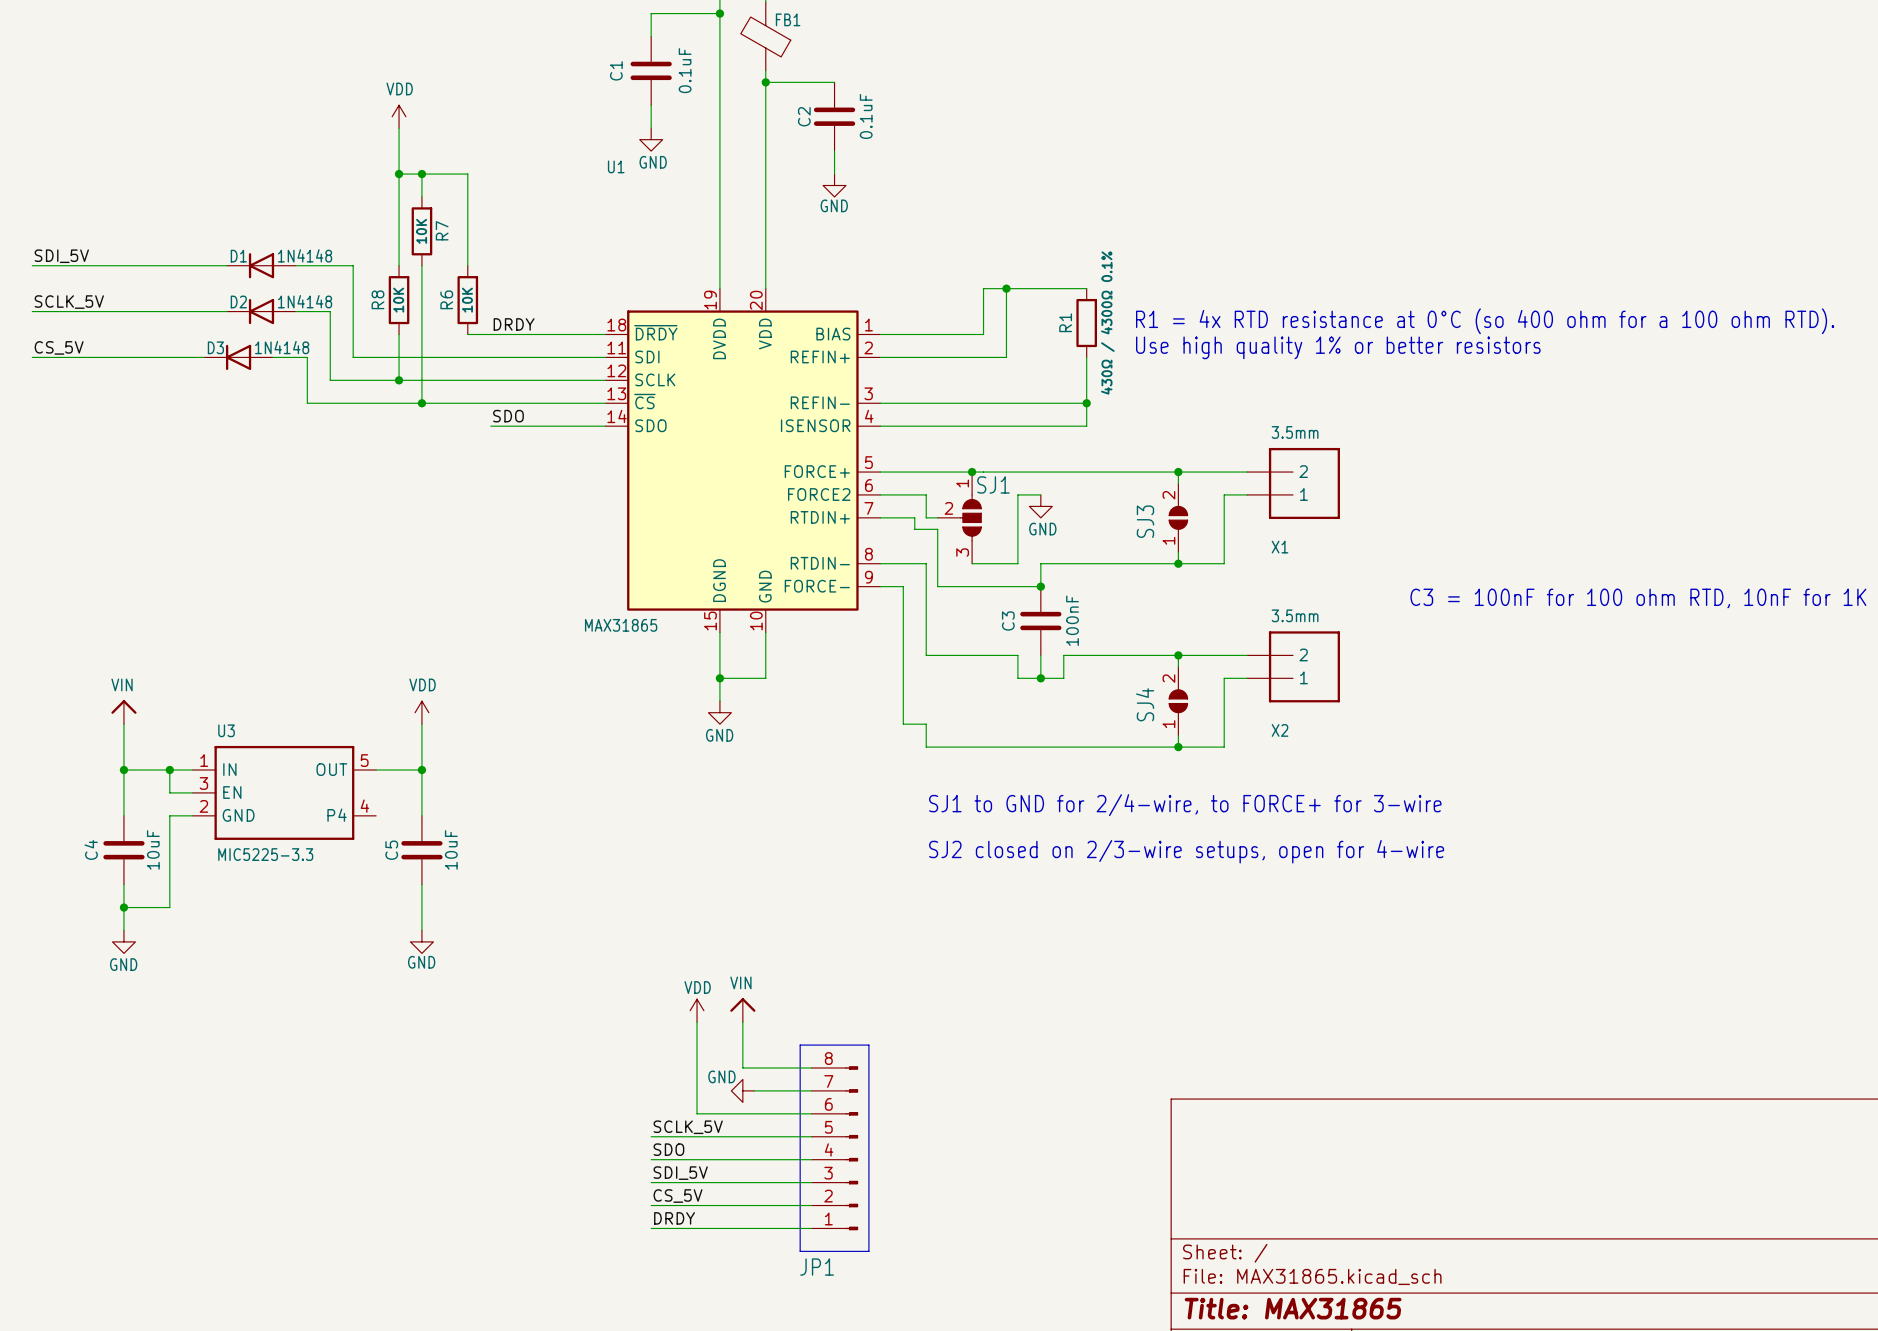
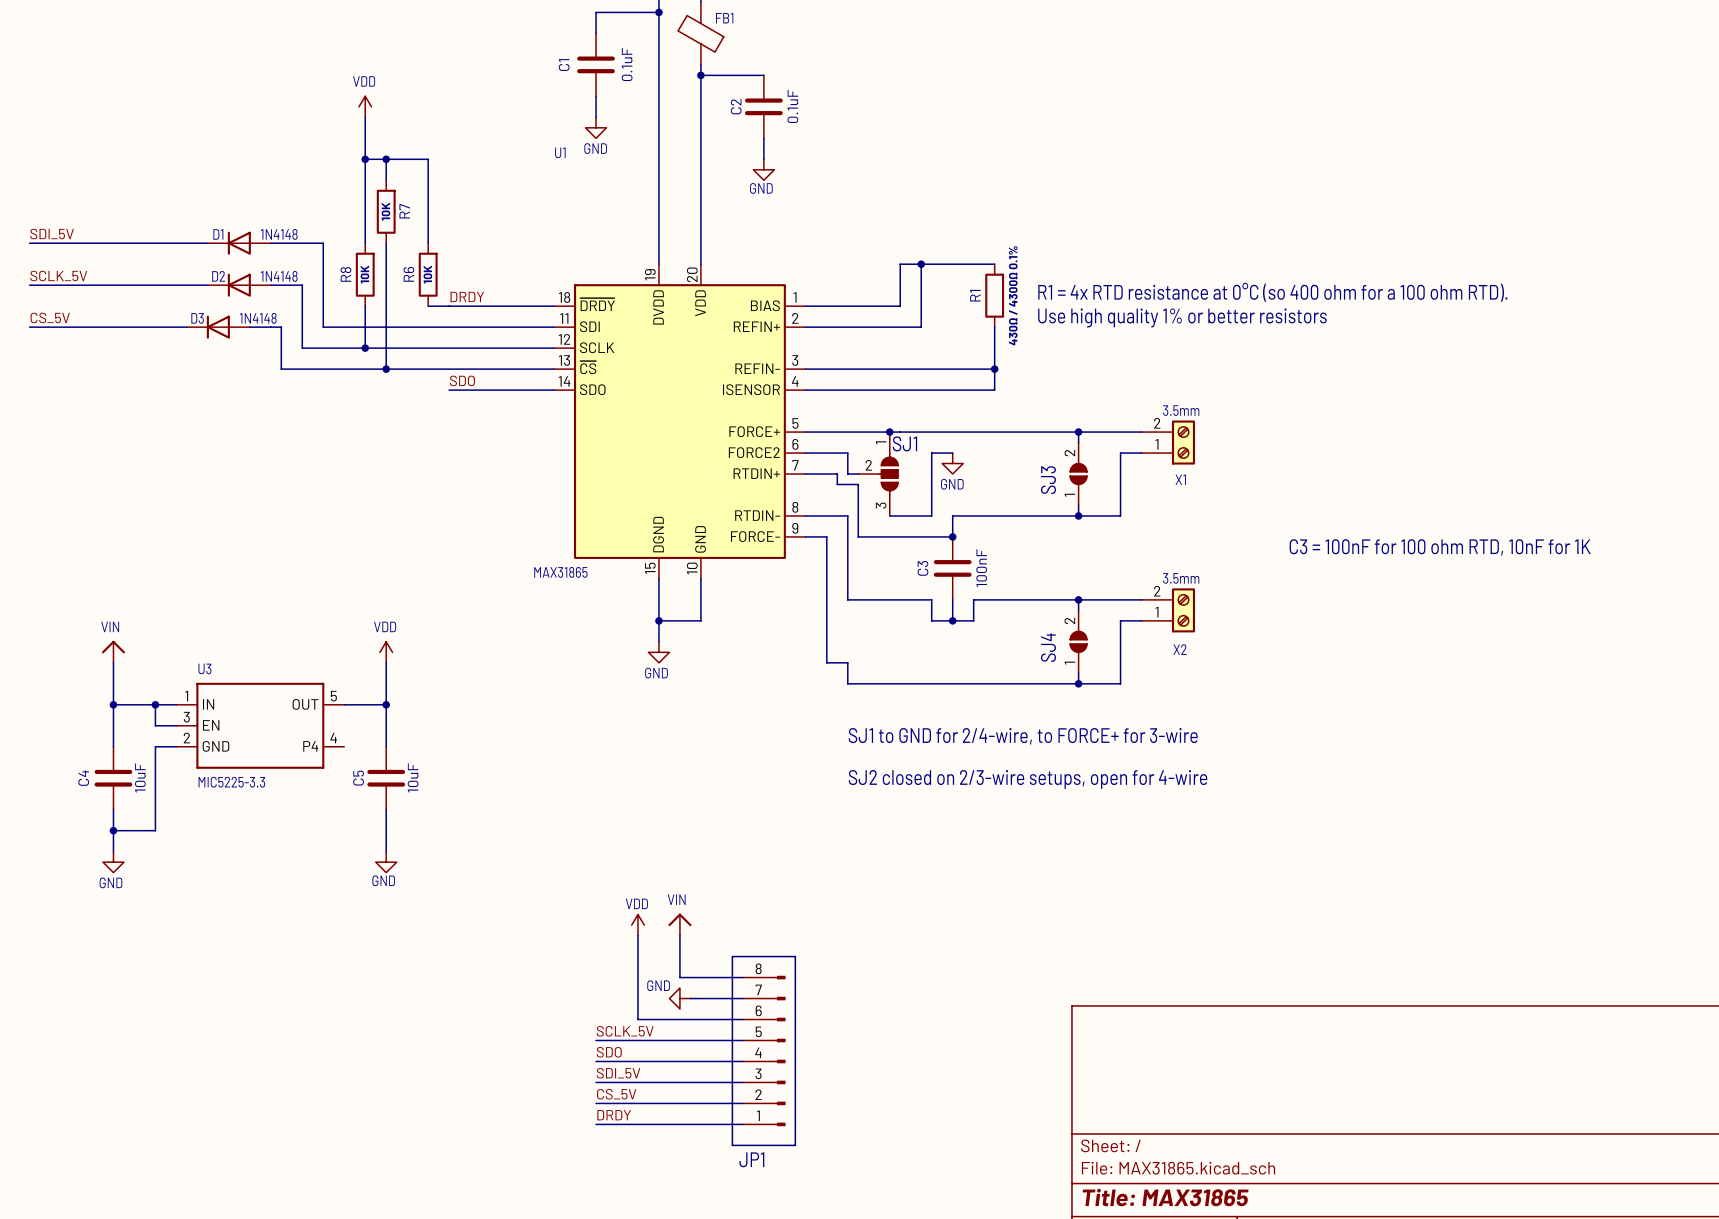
X1 value position: 3.5mm (1295, 432) -> 3.5mm (1181, 410)
X1 symbol: [1247, 447, 1340, 520] -> [1141, 420, 1196, 465]
X1 name position: X1 (1280, 547) -> X1 (1180, 479)
X2 value position: 3.5mm (1295, 615) -> 3.5mm (1181, 578)
X2 symbol: [1247, 631, 1340, 703] -> [1141, 588, 1196, 633]
X2 name position: X2 (1280, 730) -> X2 (1180, 649)

